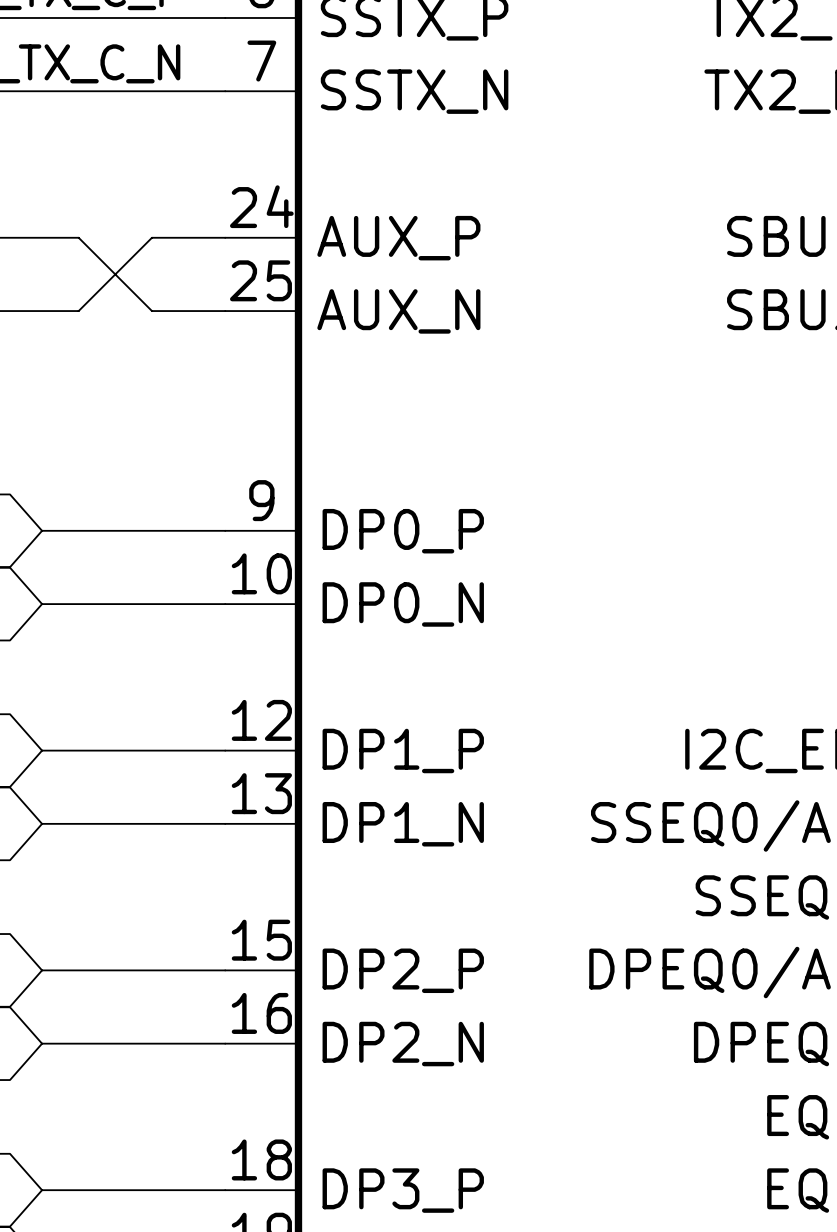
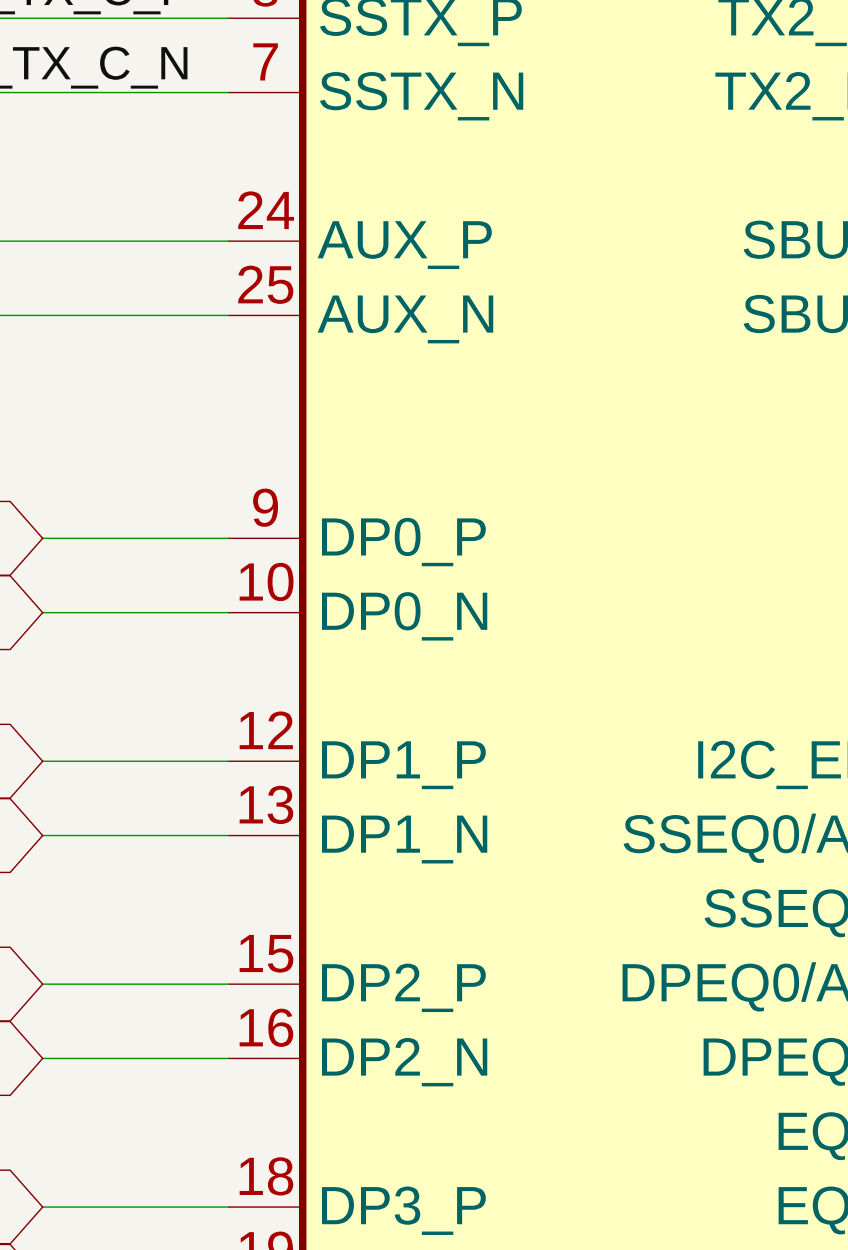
wire: (78, 237) (151, 311) -> (79, 241) (154, 241)
wire: (151, 237) (78, 311) -> (154, 315) (79, 315)

